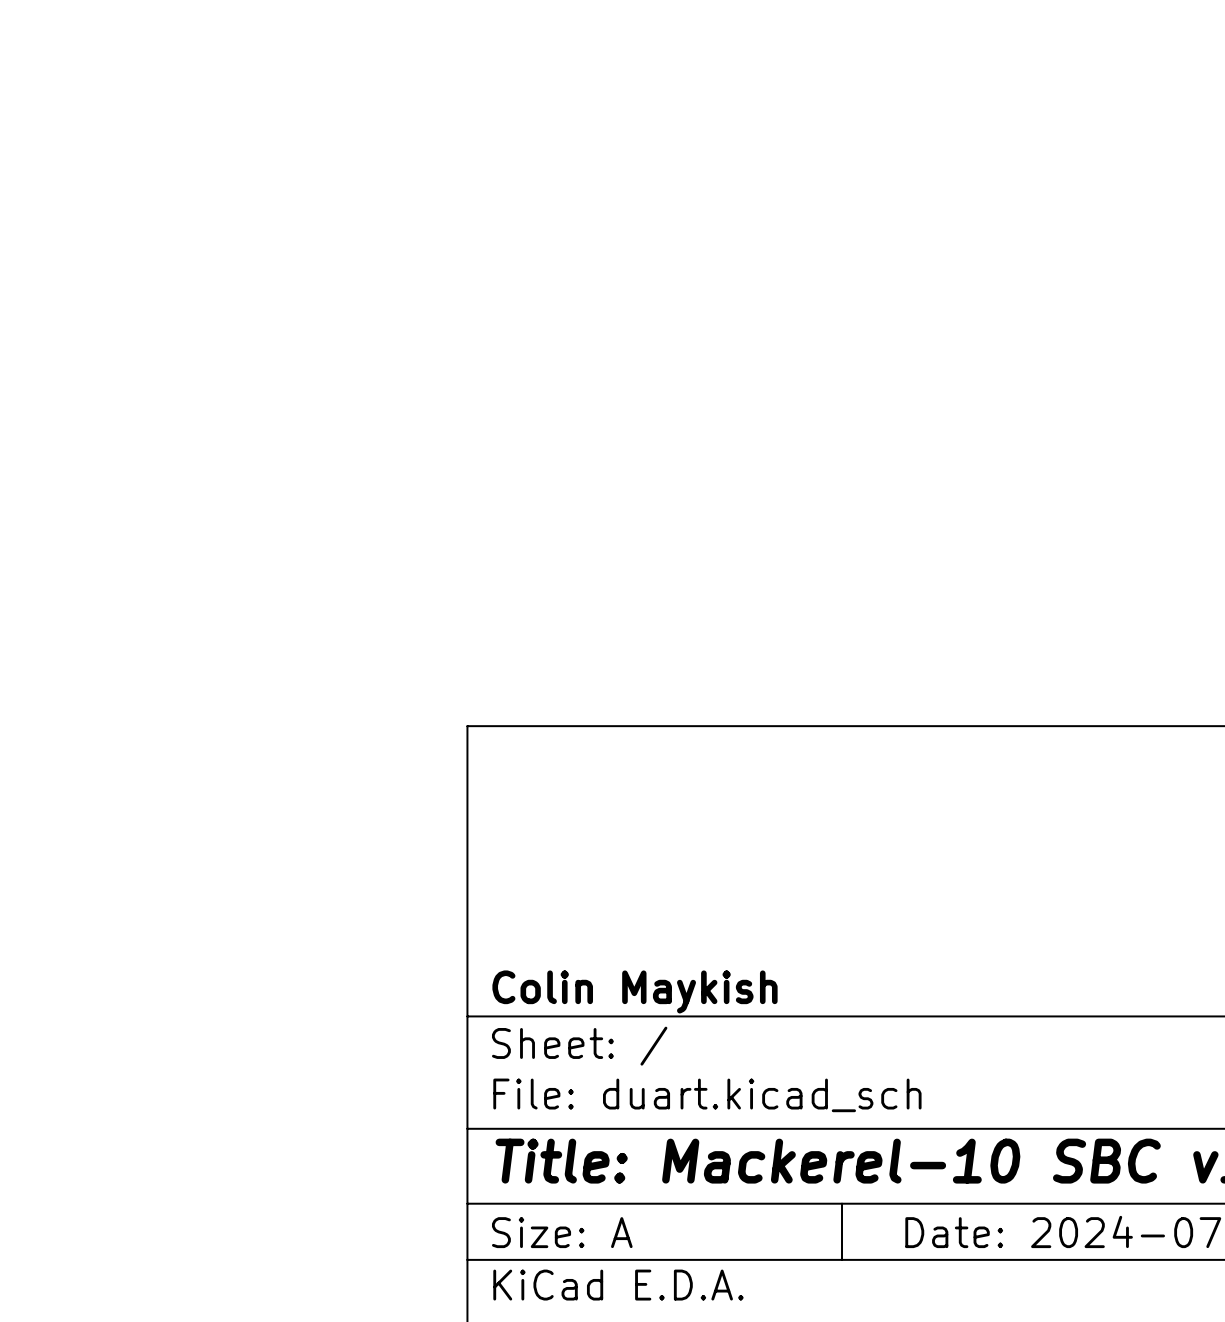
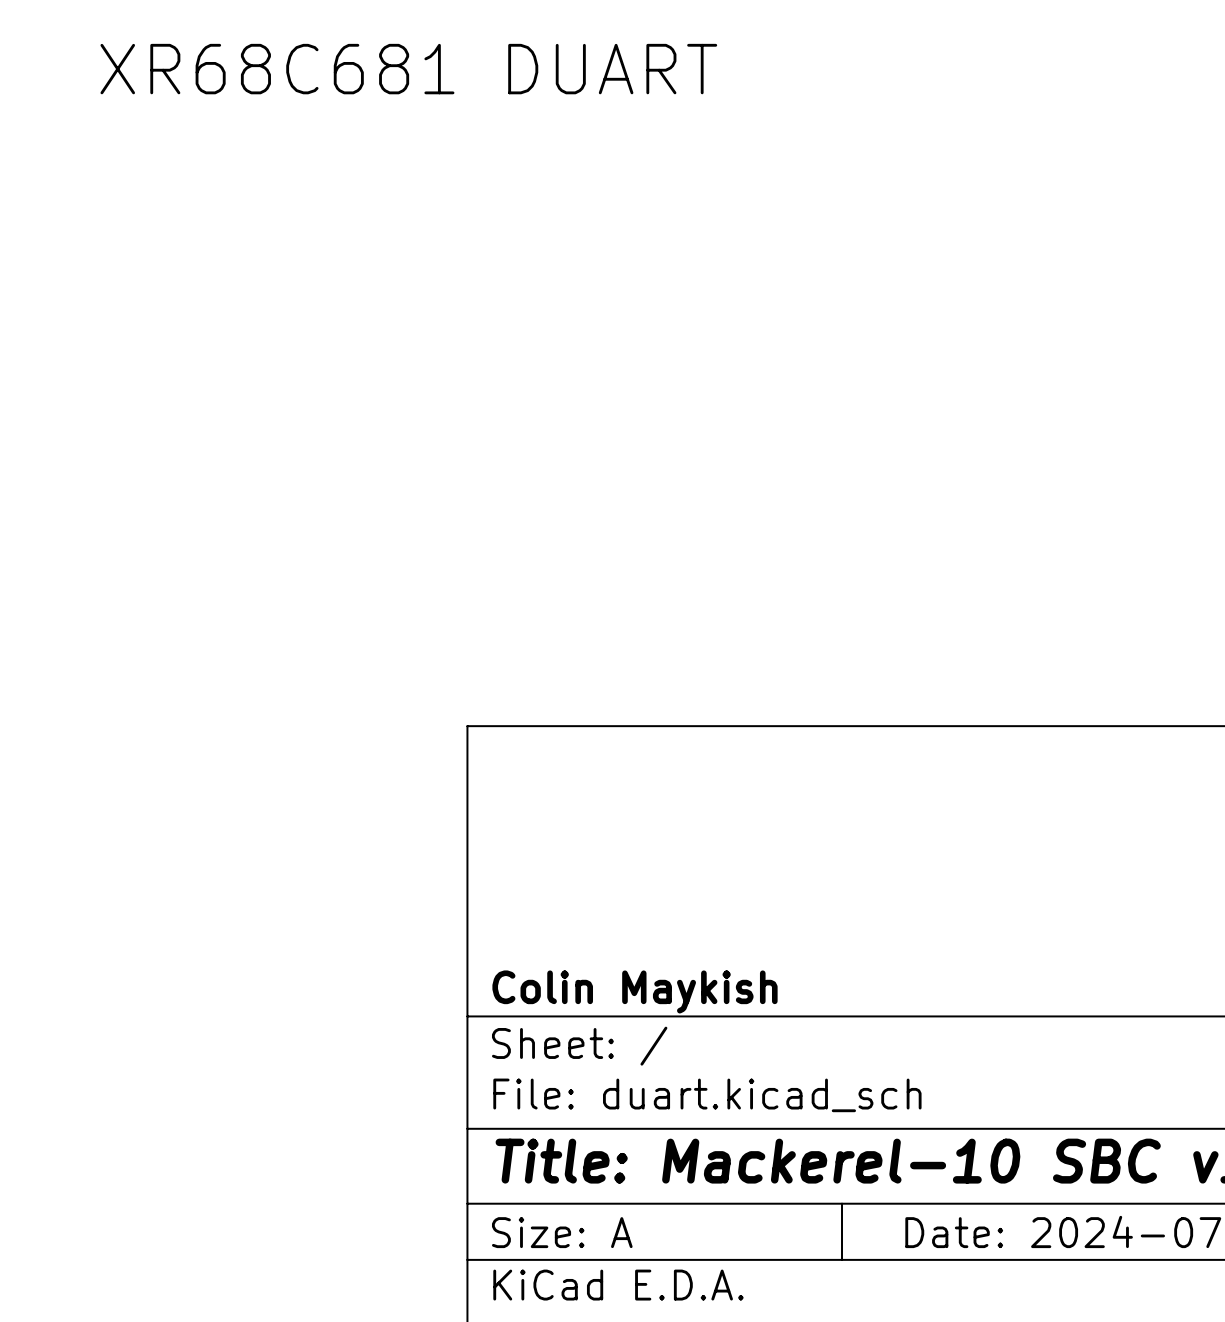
text: none -> XR68C681 DUART (408, 69)

